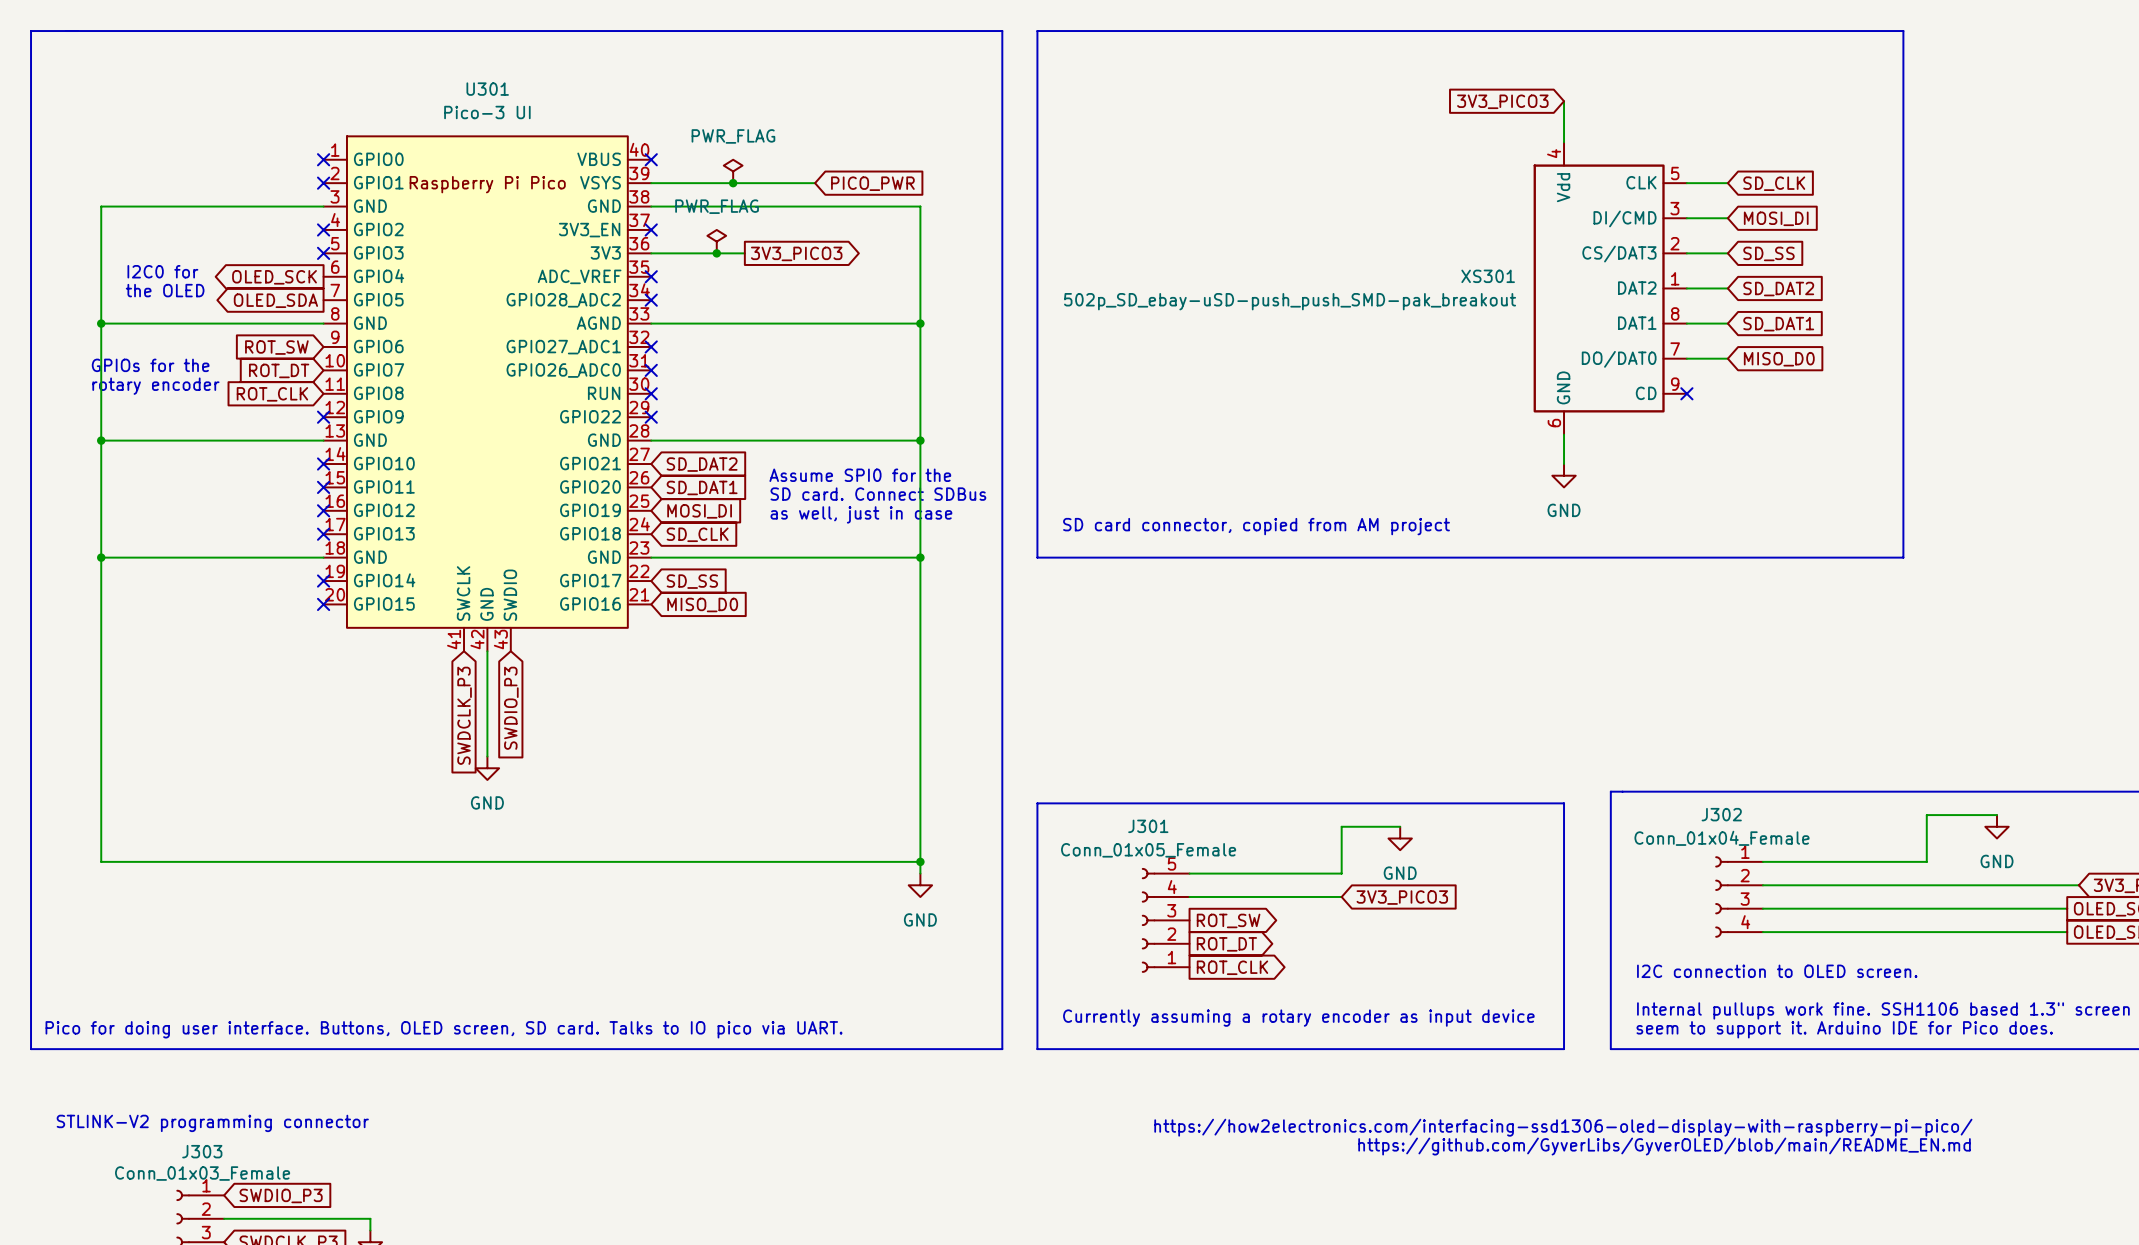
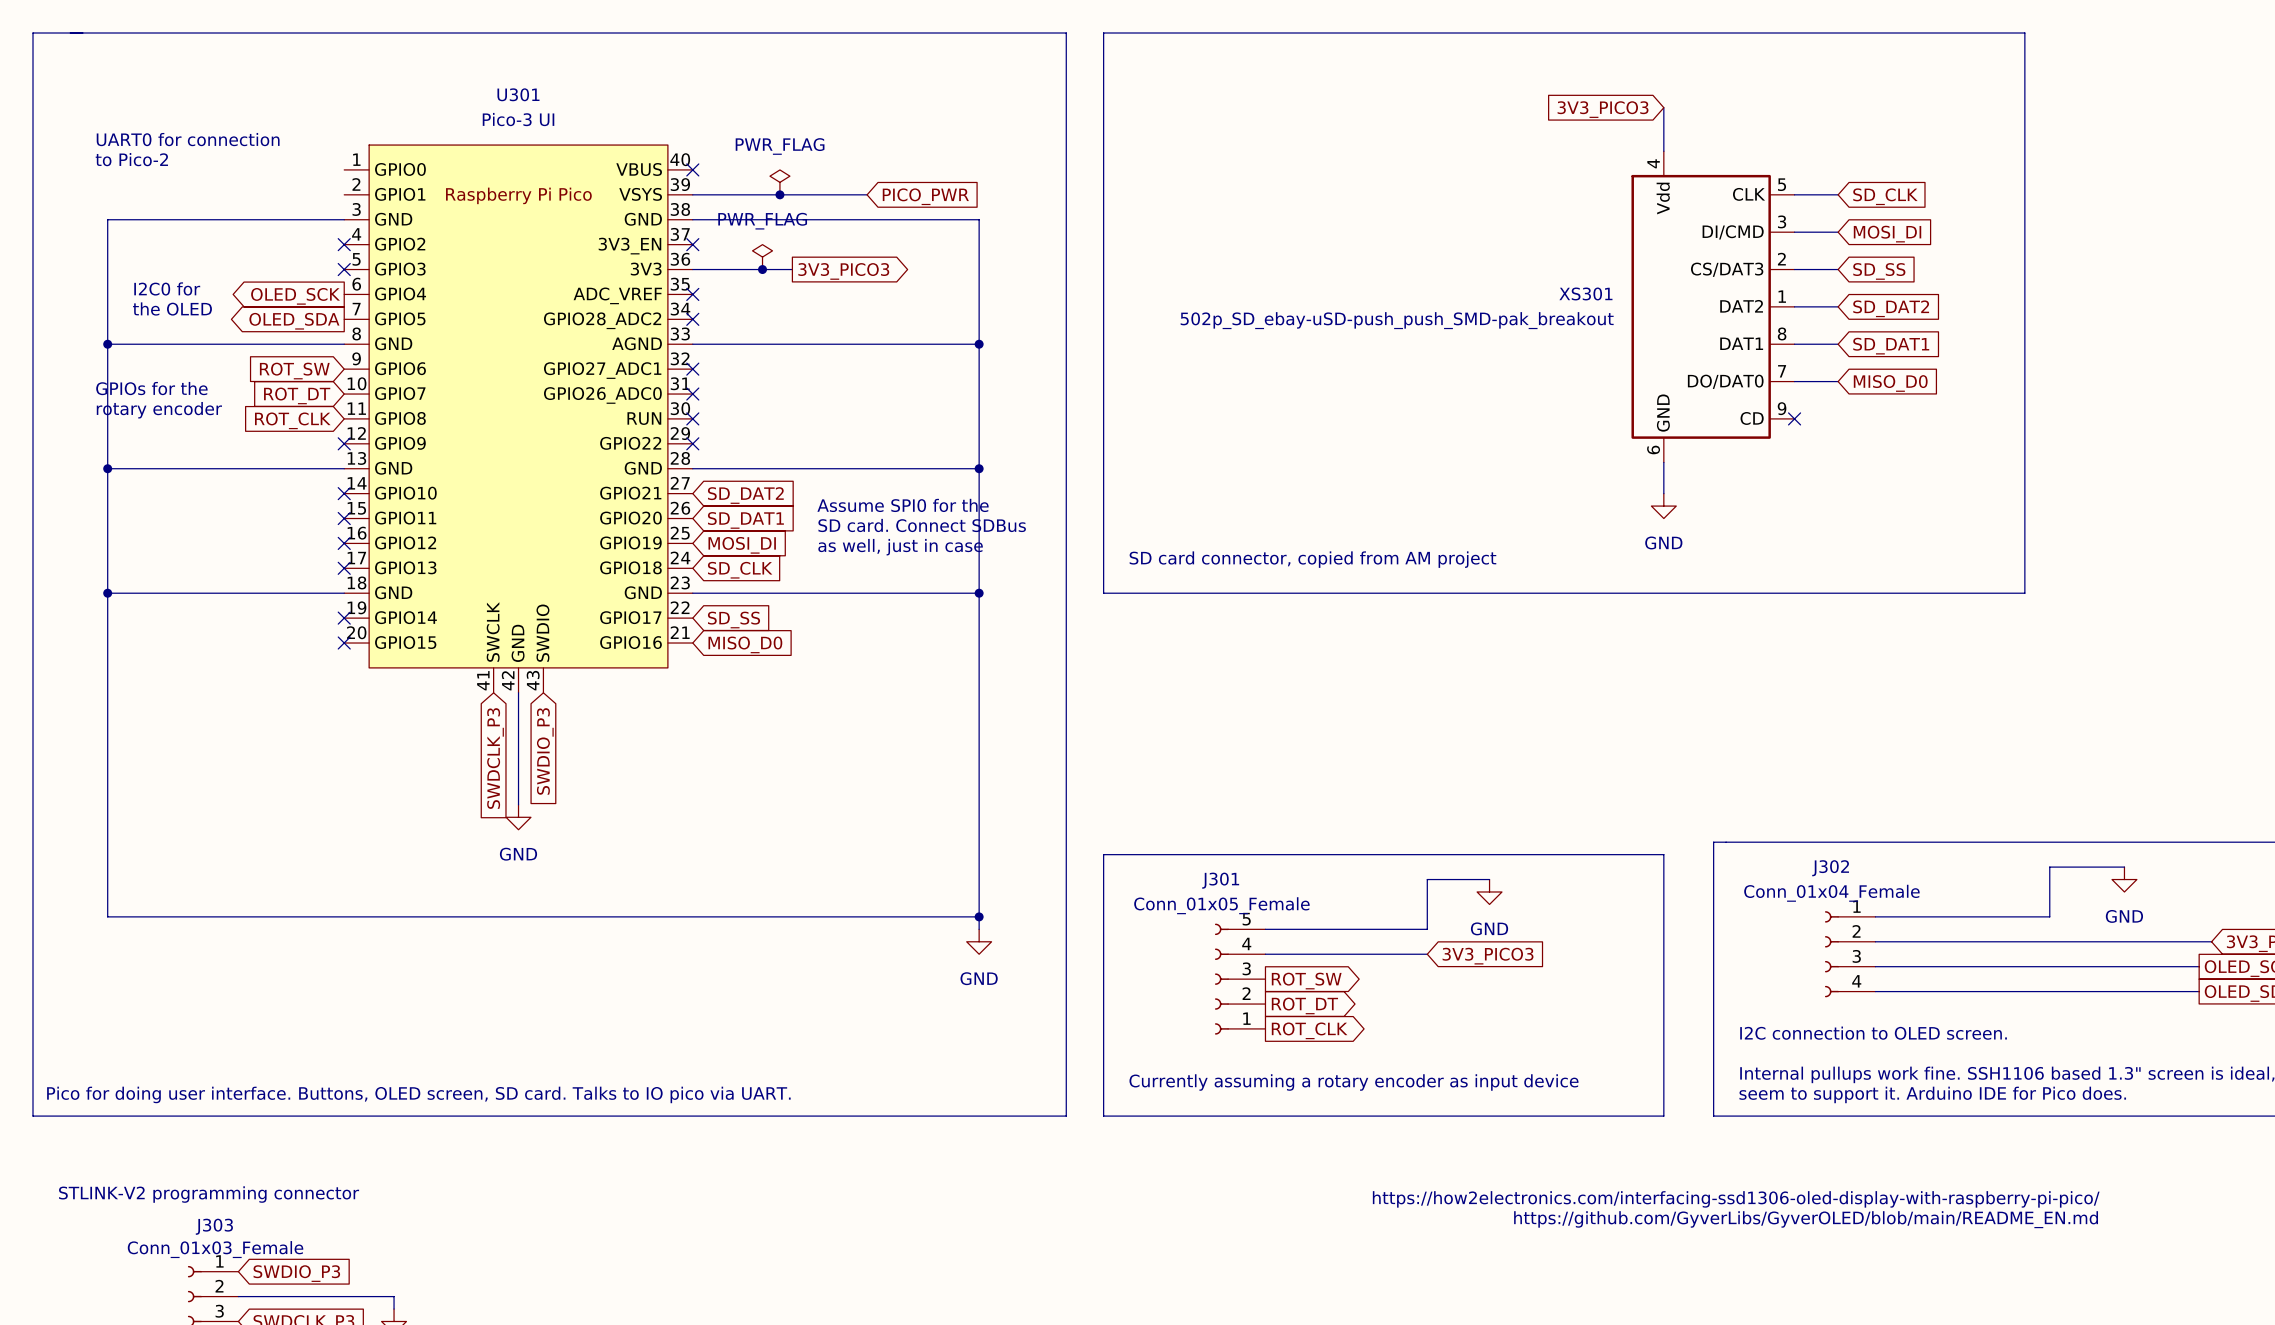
text: none -> UART0 for connection (188, 139)
text: none -> to Pico-2 (131, 159)
no-connect mark: (323, 159) -> none
no-connect mark: (323, 183) -> none

